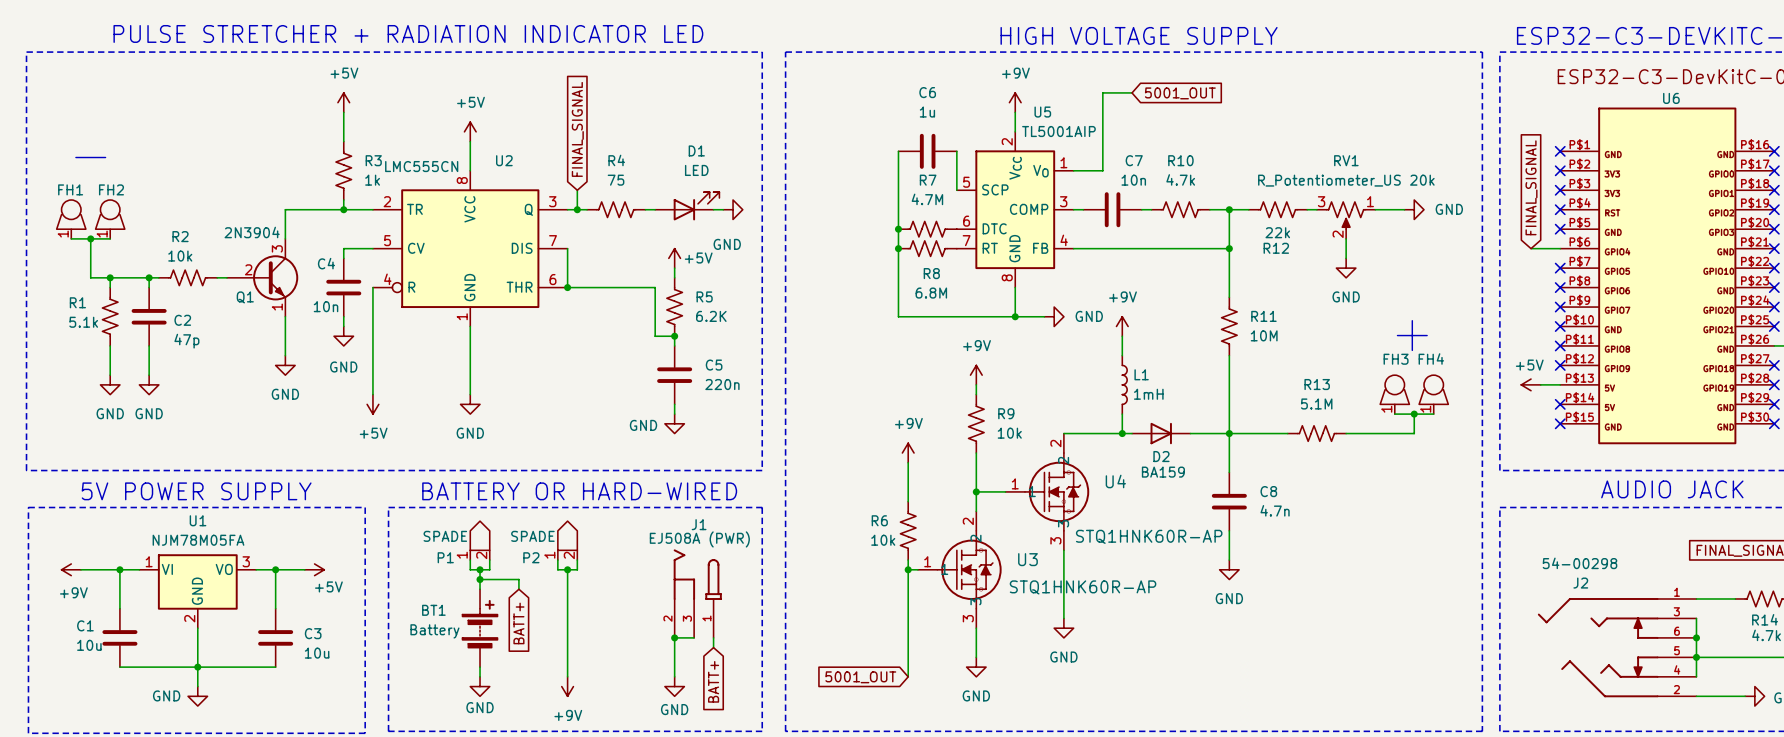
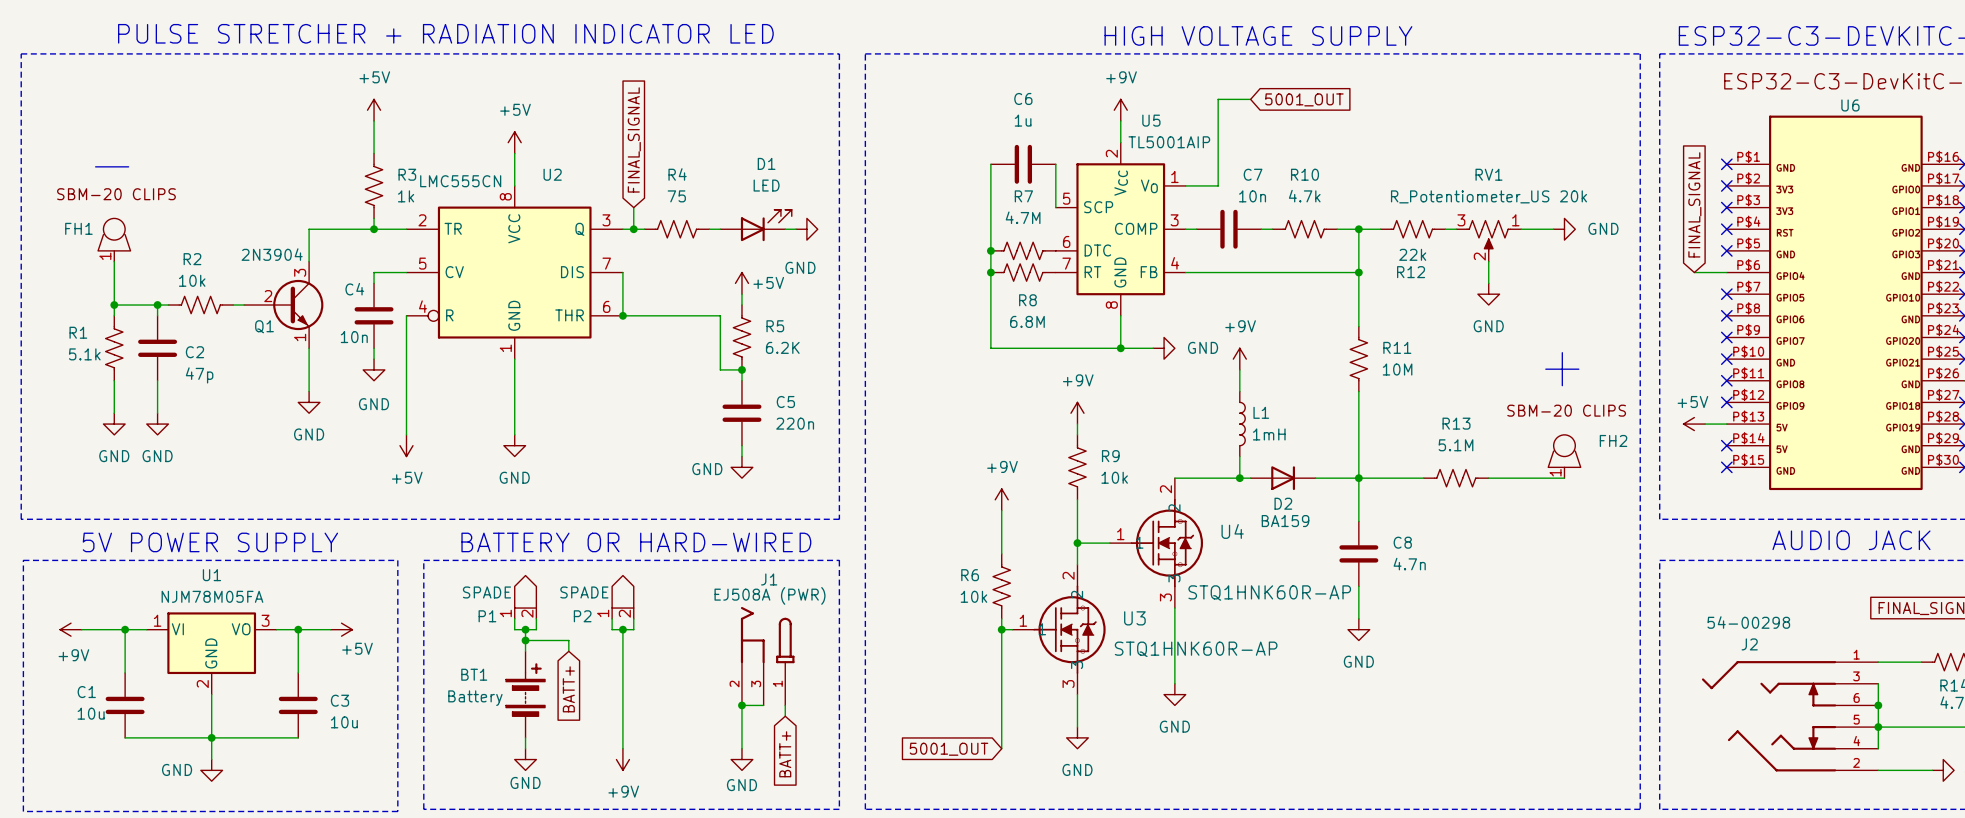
text position: _ (90, 157) -> _ (112, 166)
FH1 text: none -> SBM-20 CLIPS (116, 194)
FH1 name position: FH1 (70, 189) -> FH1 (78, 228)
FH2 name position: FH2 (111, 189) -> FH2 (1613, 440)
FH1 position: (71, 219) -> (114, 240)
FH2 position: (110, 219) -> (1564, 456)
wire: (71, 238) (110, 238) -> none
wire: (90, 238) (90, 277) (110, 277) -> (114, 261) (114, 305)
junction: (90, 238) -> none
FH2 text: none -> SBM-20 CLIPS (1566, 410)
FH3: (1394, 394) -> none
FH4: (1433, 394) -> none
wire: (1394, 414) (1433, 414) -> none
junction: (1414, 414) -> none

